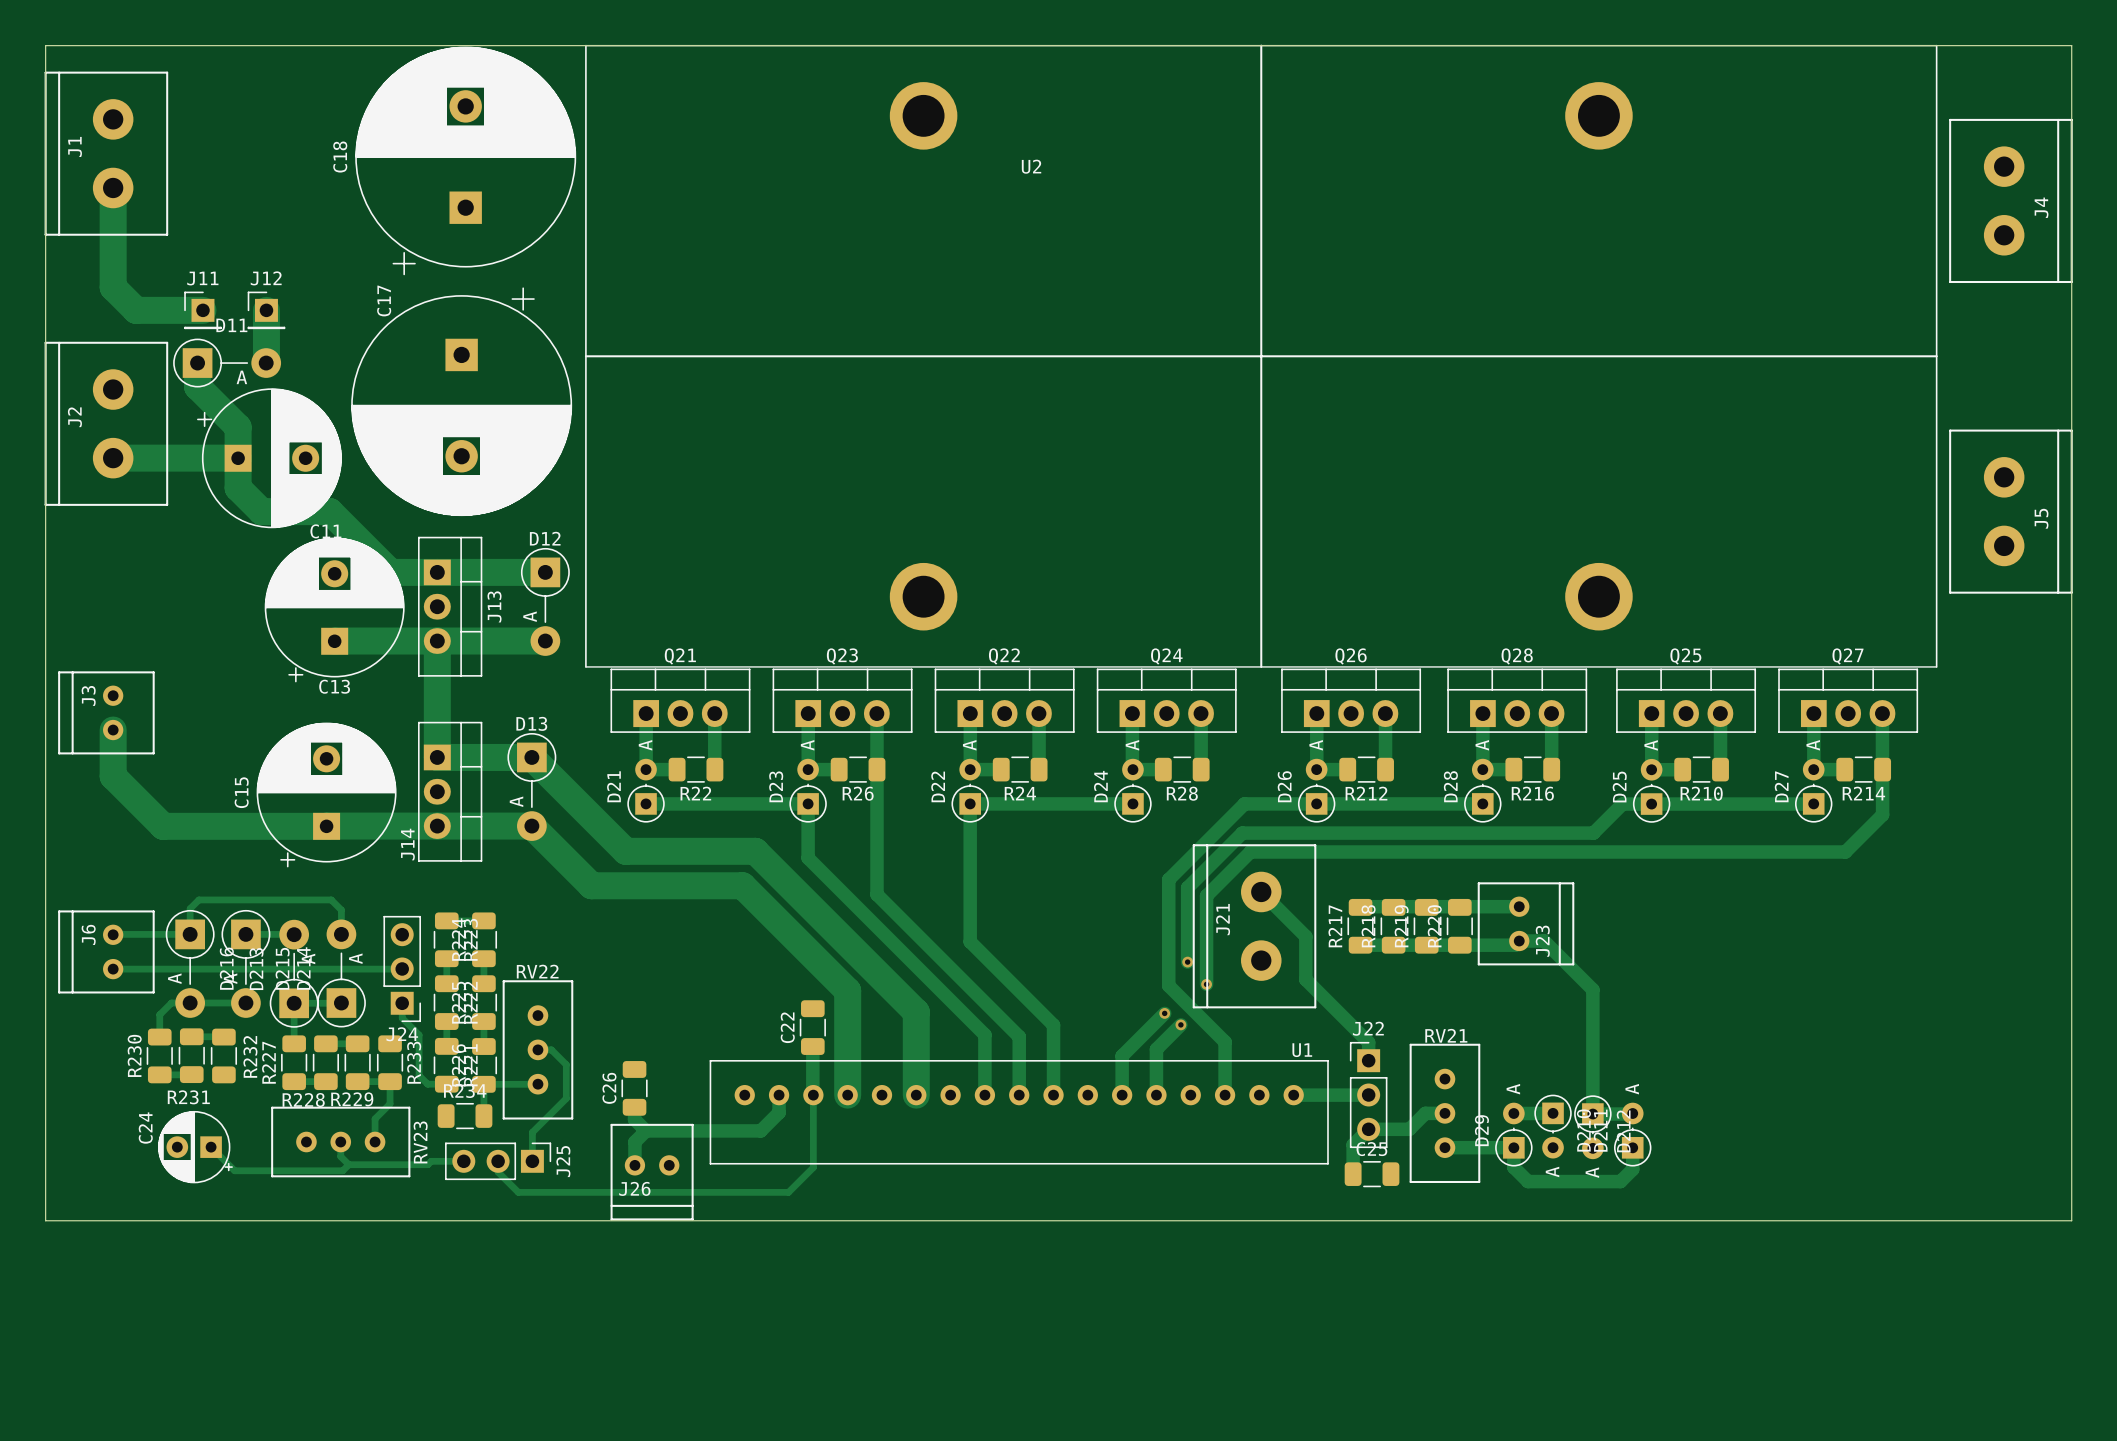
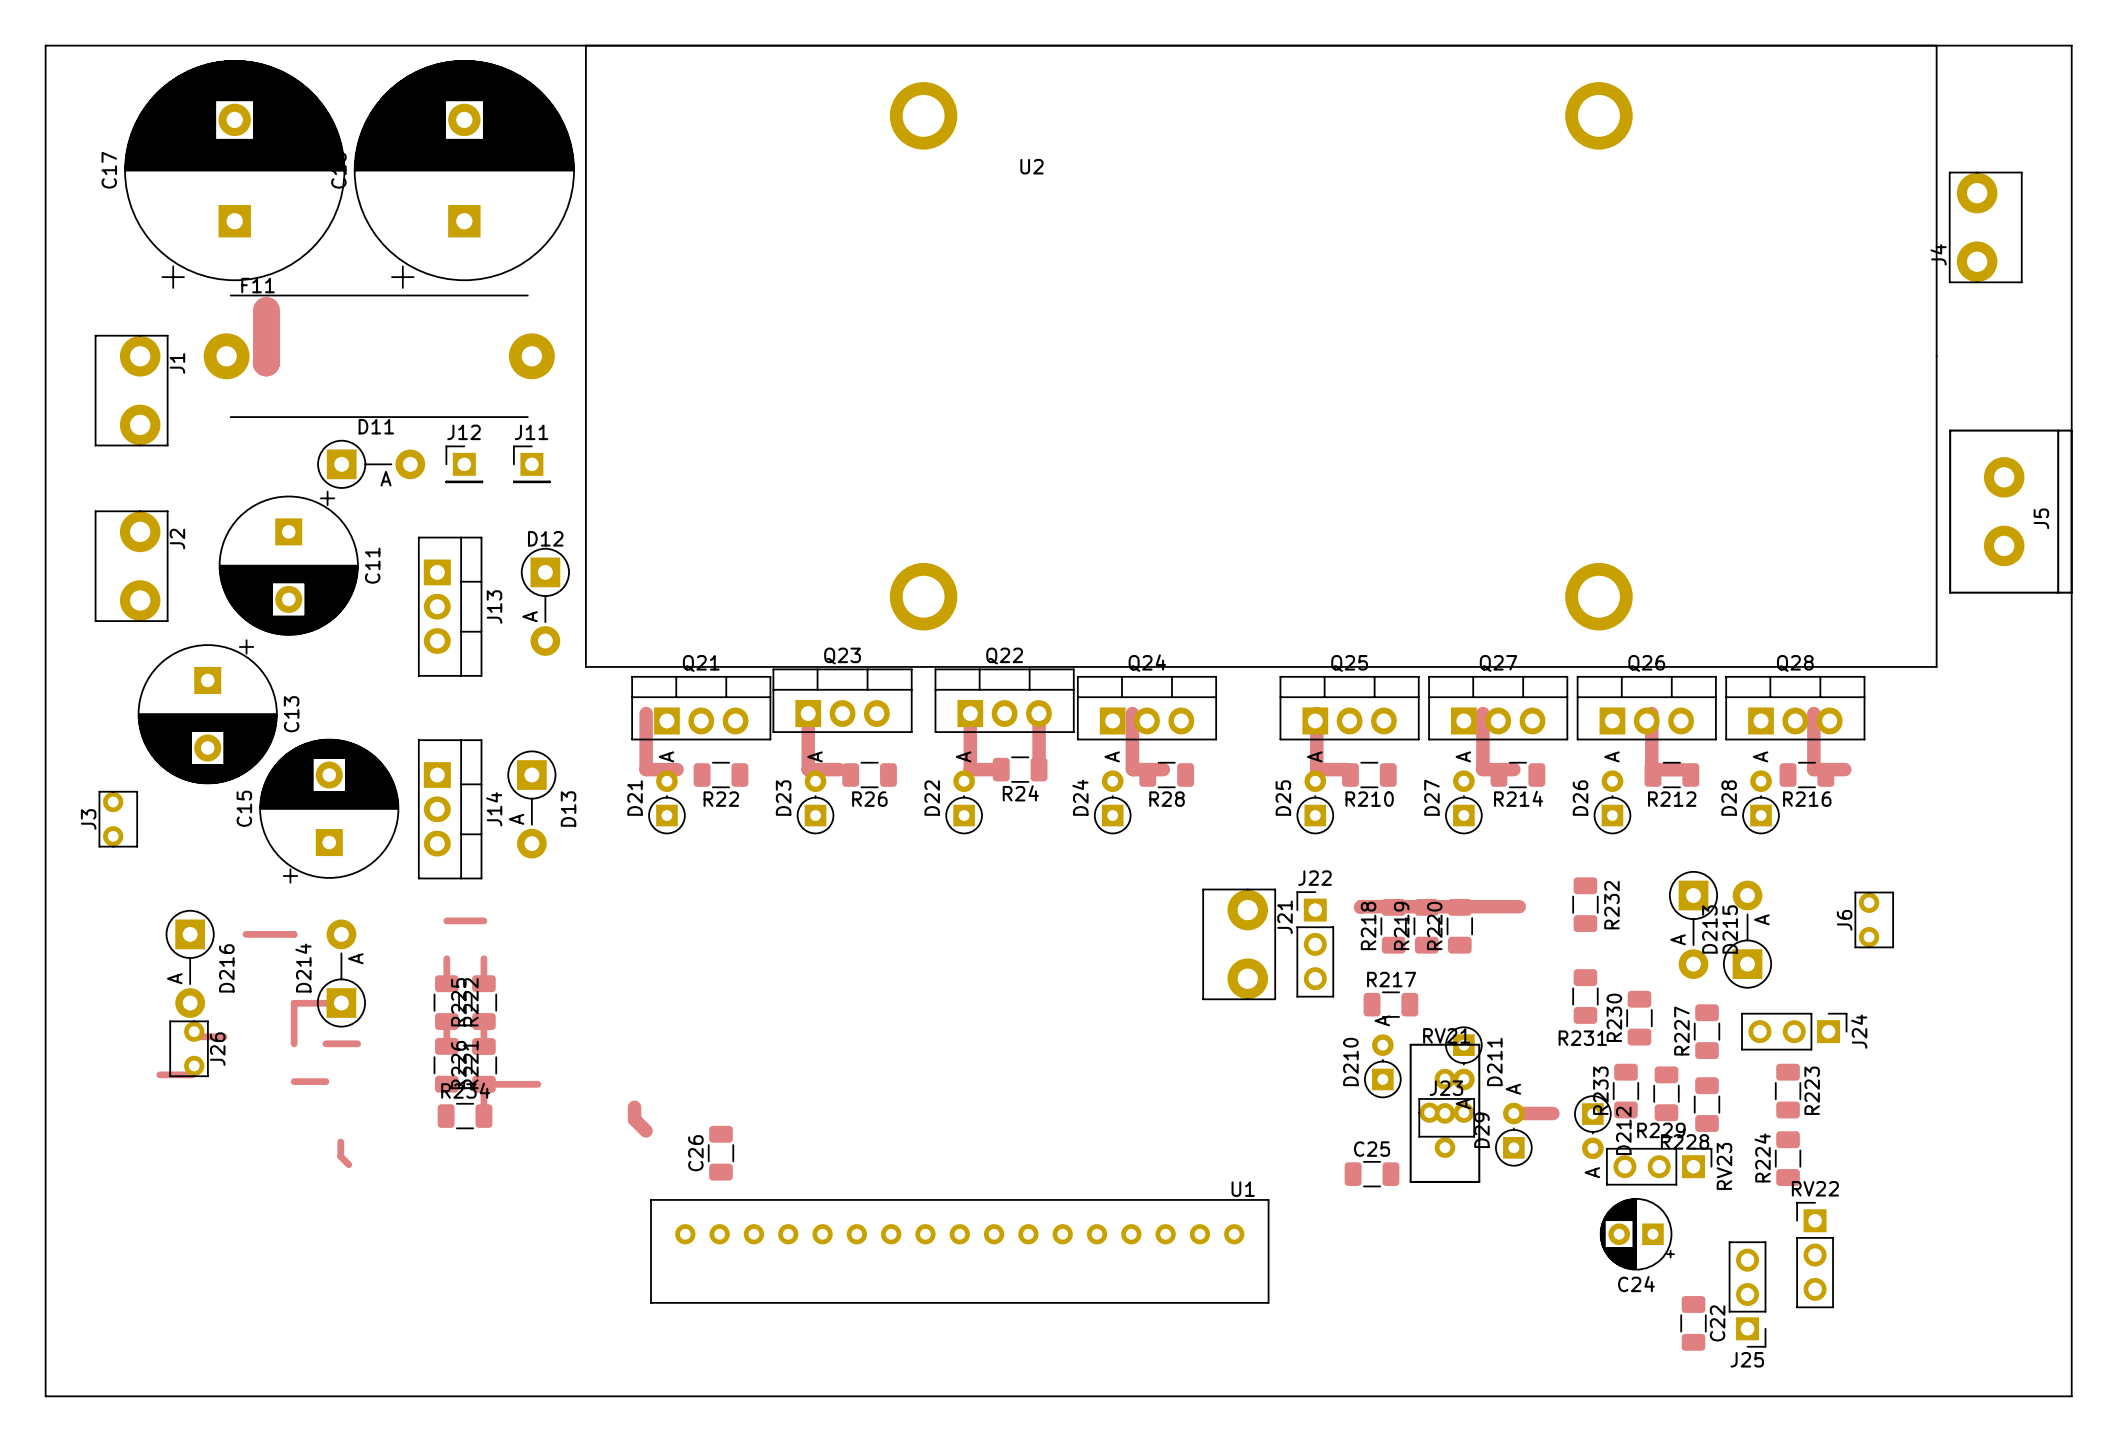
U2 footprint: [584, 44, 1938, 668] -> [585, 44, 1938, 668]
J1 footprint: [44, 71, 169, 236] -> [94, 334, 169, 447]
J4 footprint: [1949, 118, 2073, 284] -> [1948, 171, 2023, 284]
J1 name position: J1 (75, 146) -> J1 (177, 363)
C18 position: (465, 160) -> (464, 174)
track: (113, 187) (113, 287) (136, 310) (202, 310) -> none
J4 name position: J4 (2041, 207) -> J4 (1938, 254)
C17 name position: C17 (384, 300) -> C17 (109, 170)
J11 position: (202, 310) -> (531, 464)
J12 position: (266, 310) -> (464, 464)
J2 footprint: [44, 341, 169, 506] -> [94, 510, 169, 622]
F11: none -> (379, 356)
track: (197, 363) (197, 386) (238, 427) (238, 487) (261, 511) (329, 511) (390, 572) (545, 572) -> none
D11 position: (227, 363) -> (371, 464)
C17 rotation: 0° (461, 401) -> 180° (234, 174)
C17 position: (461, 401) -> (234, 174)
J2 name position: J2 (74, 417) -> J2 (177, 539)
track: (113, 458) (237, 458) -> none
C11 rotation: 0° (269, 458) -> 90° clockwise (288, 563)
C11 position: (269, 458) -> (288, 563)
C11 name position: C11 (325, 531) -> C11 (372, 565)
C13 rotation: 0° (334, 609) -> 180° (207, 711)
C13 position: (334, 609) -> (207, 711)
track: (437, 641) (437, 757) (531, 757) (625, 851) (755, 851) (916, 1012) (916, 1095) -> none
track: (545, 641) (334, 641) -> none
J3 footprint: [58, 671, 155, 755] -> [98, 790, 138, 848]
C13 name position: C13 (334, 686) -> C13 (291, 714)
Q21 position: (680, 700) -> (701, 708)
Q24 position: (1166, 700) -> (1147, 708)
Q26 position: (1351, 700) -> (1646, 708)
Q28 position: (1517, 700) -> (1795, 708)
Q25 position: (1686, 700) -> (1349, 708)
Q27 position: (1848, 700) -> (1498, 708)
track: (714, 713) (714, 769) -> none
track: (876, 713) (876, 894) (1019, 1036) (1019, 1095) -> none
track: (1201, 713) (1201, 769) -> none
track: (1385, 713) (1385, 769) -> none
track: (1551, 713) (1551, 769) -> none
track: (1720, 713) (1720, 769) -> none
track: (1882, 713) (1882, 769) -> none
D13 name rotation: 0° (531, 723) -> 90° counterclockwise (568, 809)
D13 name position: D13 (531, 723) -> D13 (568, 809)
track: (113, 730) (113, 776) (163, 826) (531, 826) (591, 885) (742, 885) (847, 990) (847, 1095) -> none
R22 position: (695, 769) -> (720, 775)
R26 position: (858, 769) -> (869, 775)
R28 position: (1182, 769) -> (1166, 775)
R212 position: (1366, 769) -> (1671, 775)
R216 position: (1532, 769) -> (1806, 775)
R210 position: (1701, 769) -> (1369, 775)
R214 position: (1863, 769) -> (1517, 775)
track: (1882, 769) (1882, 814) (1845, 852) (1250, 852) (1206, 895) (1206, 984) -> none
D13 position: (531, 786) -> (531, 804)
D21 position: (646, 790) -> (666, 802)
D23 position: (808, 790) -> (815, 802)
D22 position: (970, 790) -> (964, 802)
D24 position: (1132, 790) -> (1112, 802)
D26 position: (1316, 790) -> (1612, 802)
D28 position: (1482, 790) -> (1761, 802)
D25 position: (1651, 790) -> (1315, 802)
D27 position: (1813, 790) -> (1463, 802)
J14 position: (450, 791) -> (450, 809)
C15 position: (326, 795) -> (329, 811)
track: (646, 803) (808, 803) (808, 858) (984, 1034) (984, 1095) -> none
track: (1132, 803) (970, 803) (970, 941) (1053, 1025) (1053, 1095) -> none
track: (1482, 803) (1244, 803) (1168, 879) (1168, 985) (1225, 1042) (1225, 1095) -> none
track: (1813, 804) (1622, 804) (1593, 833) (1242, 833) (1187, 887) (1187, 962) -> none
J14 name position: J14 (407, 844) -> J14 (494, 809)
J21 footprint: [1192, 844, 1317, 1009] -> [1202, 888, 1277, 1001]
J23 footprint: [1477, 882, 1575, 966] -> [1418, 1098, 1475, 1138]
track: (1261, 891) (1305, 936) (1305, 979) (1368, 1042) (1368, 1060) -> none
J6 footprint: [58, 910, 155, 994] -> [1854, 891, 1894, 949]
J21 name position: J21 (1223, 919) -> J21 (1285, 917)
R217 rotation: 0° (1360, 926) -> 90° clockwise (1390, 1004)
R217 position: (1360, 926) -> (1390, 1004)
track: (341, 934) (341, 910) (331, 899) (198, 899) (190, 908) (190, 934) (113, 934) -> none
R223 position: (446, 939) -> (1788, 1091)
R224 position: (483, 939) -> (1788, 1158)
J23 name position: J23 (1542, 941) -> J23 (1446, 1088)
track: (1360, 945) (1515, 945) (1519, 941) (1544, 941) (1592, 989) (1592, 1114) (1632, 1113) -> none
via: (1187, 962) -> none
D215 position: (245, 963) -> (1693, 925)
J24 rotation: 0° (402, 968) -> 90° counterclockwise (1794, 1031)
J24 position: (402, 968) -> (1794, 1031)
track: (113, 969) (402, 969) -> none
D213 position: (294, 973) -> (1747, 934)
RV22 footprint: [502, 980, 574, 1120] -> [1796, 1201, 1834, 1309]
via: (1206, 984) -> none
track: (245, 1003) (171, 1003) (159, 1014) (159, 1037) -> none
track: (402, 1003) (402, 1018) (419, 1035) (419, 1075) (427, 1084) (446, 1084) -> none
track: (1164, 1013) (1122, 1055) (1122, 1095) -> none
via: (1164, 1013) -> none
track: (1180, 1024) (1156, 1049) (1156, 1095) -> none
via: (1180, 1024) -> none
C22 name position: C22 (787, 1027) -> C22 (1717, 1323)
C22 position: (812, 1027) -> (1693, 1323)
track: (812, 1046) (813, 1167) (788, 1192) (518, 1192) (498, 1172) (498, 1161) -> none
track: (537, 1049) (551, 1049) (566, 1064) (566, 1098) (532, 1132) (532, 1161) -> none
R230 position: (159, 1055) -> (1639, 1018)
R231 position: (191, 1055) -> (1585, 996)
R232 position: (223, 1055) -> (1585, 904)
R227 position: (294, 1062) -> (1707, 1031)
R228 position: (325, 1062) -> (1707, 1104)
R229 position: (357, 1062) -> (1666, 1093)
R233 position: (390, 1062) -> (1625, 1091)
R233 name position: R233 (414, 1062) -> R233 (1600, 1090)
track: (357, 1081) (390, 1081) (390, 1103) (375, 1118) (375, 1142) -> none
C26 position: (634, 1088) -> (720, 1153)
track: (779, 1095) (779, 1112) (760, 1130) (646, 1130) (634, 1142) (634, 1165) -> none
track: (1293, 1095) (1368, 1095) -> none
J22 position: (1368, 1095) -> (1315, 944)
RV23 footprint: [271, 1106, 411, 1178] -> [1606, 1147, 1713, 1186]
U1 position: (1019, 1112) -> (959, 1251)
track: (1444, 1113) (1425, 1113) (1409, 1129) (1368, 1129) (1353, 1144) (1353, 1174) -> none
J26 footprint: [610, 1123, 694, 1221] -> [169, 1020, 209, 1078]
D210 rotation: 0° (1553, 1126) -> 180° (1382, 1066)
D210 position: (1553, 1126) -> (1382, 1066)
C24 name rotation: 0° (145, 1128) -> 90° clockwise (1636, 1284)
C24 name position: C24 (145, 1128) -> C24 (1636, 1284)
D211 rotation: 0° (1632, 1134) -> 180° (1463, 1058)
D211 position: (1632, 1134) -> (1463, 1058)
C24 position: (195, 1147) -> (1637, 1234)
track: (211, 1147) (234, 1170) (342, 1170) (348, 1164) (427, 1164) (431, 1161) (463, 1161) -> none
track: (1444, 1147) (1513, 1147) -> none
track: (1513, 1147) (1513, 1167) (1528, 1181) (1620, 1181) (1632, 1169) (1632, 1147) -> none
J25 rotation: 0° (498, 1161) -> 90° clockwise (1747, 1294)
J25 position: (498, 1161) -> (1747, 1294)
J26 name position: J26 (634, 1188) -> J26 (217, 1049)
board edge: (45, 1220) (2071, 1220) -> (45, 1220) (45, 1396) (2071, 1396) (2071, 1220)

